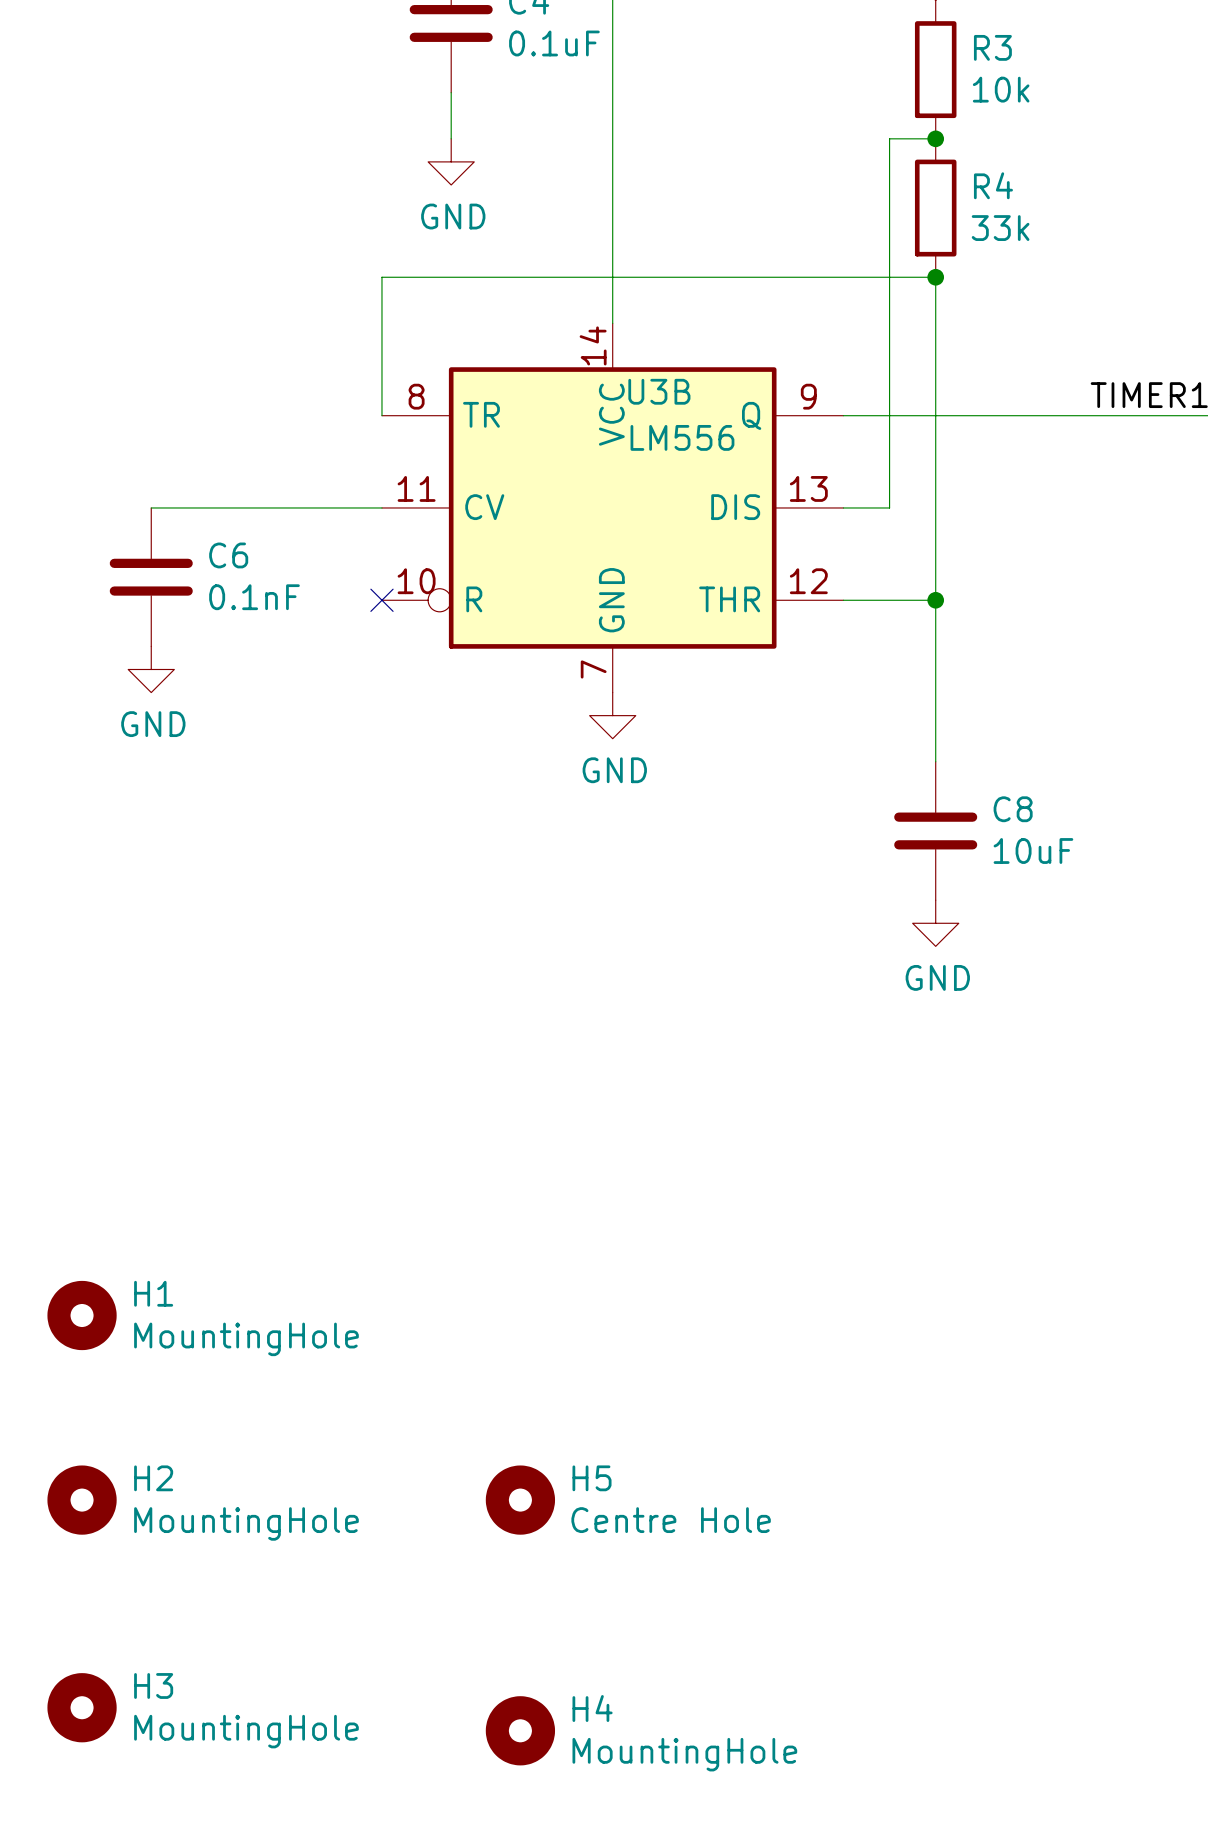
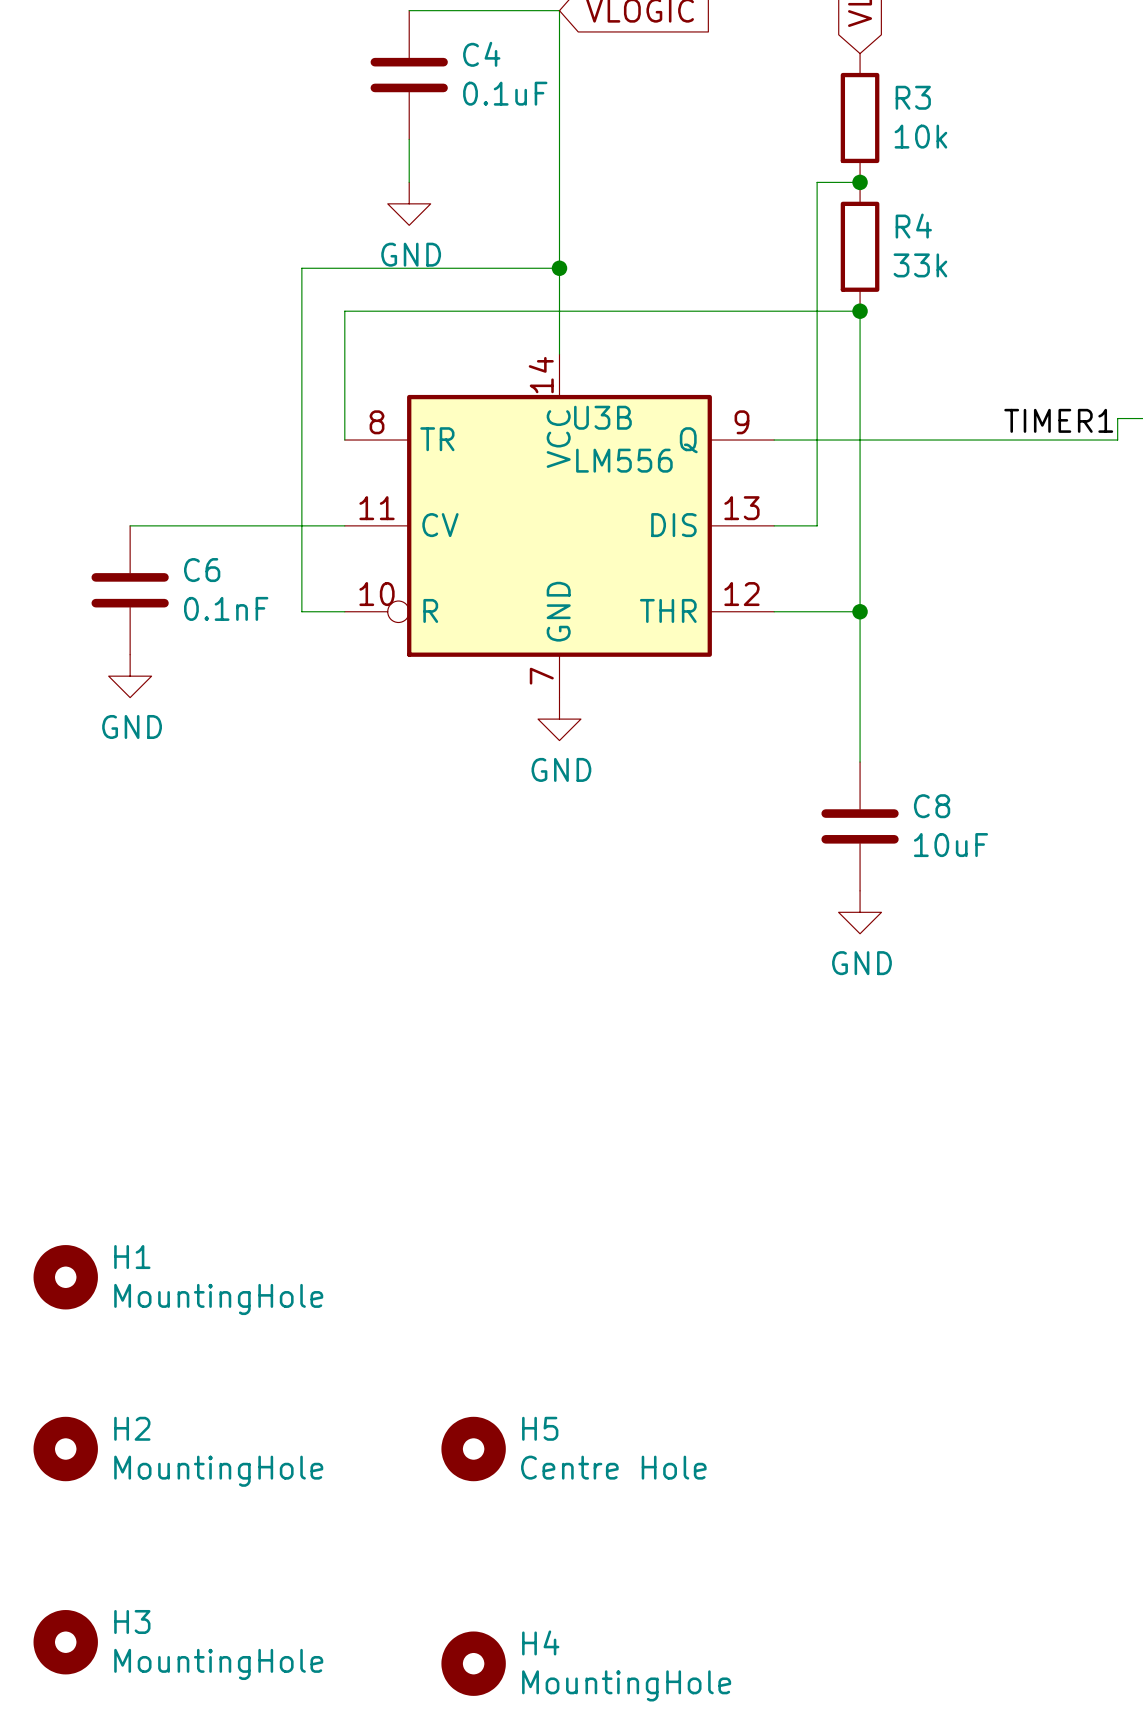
wire: none -> (559, 268) (301, 268) (301, 611) (344, 611)
junction: none -> (559, 268)
no-connect mark: (381, 600) -> none

